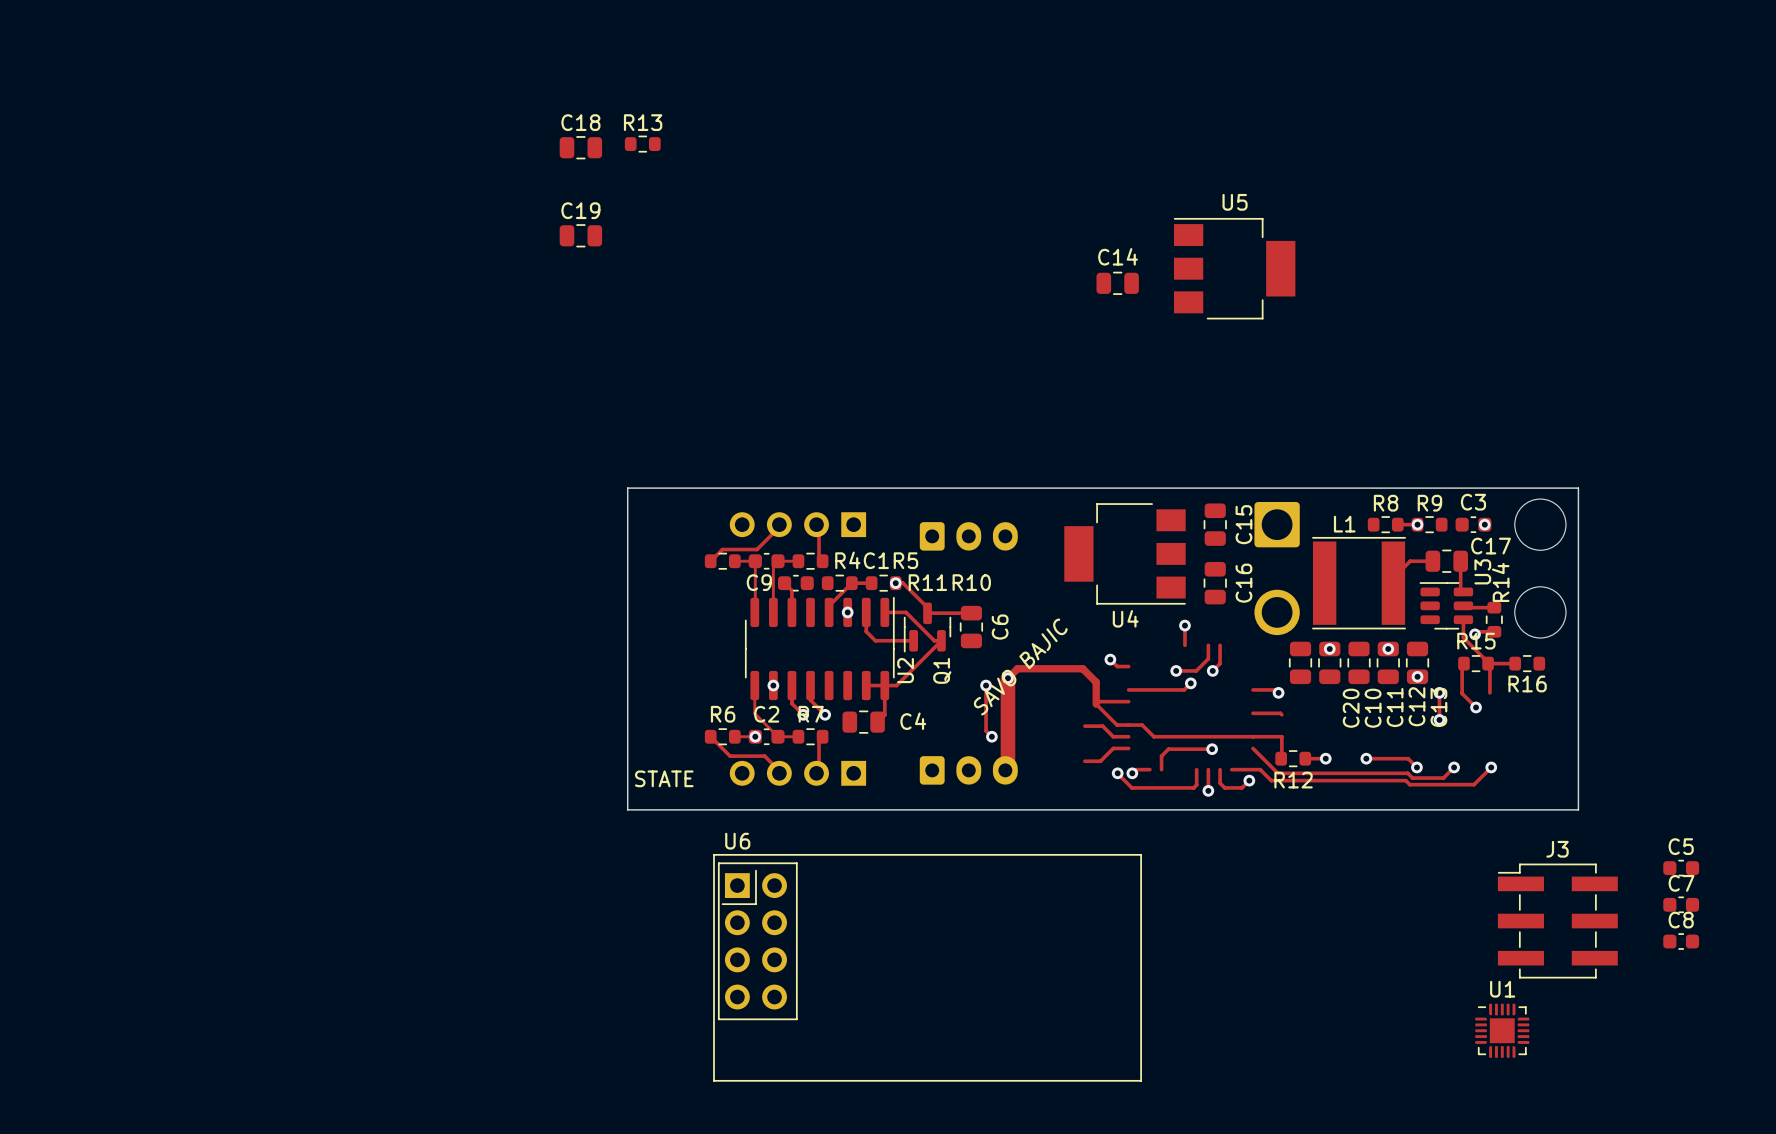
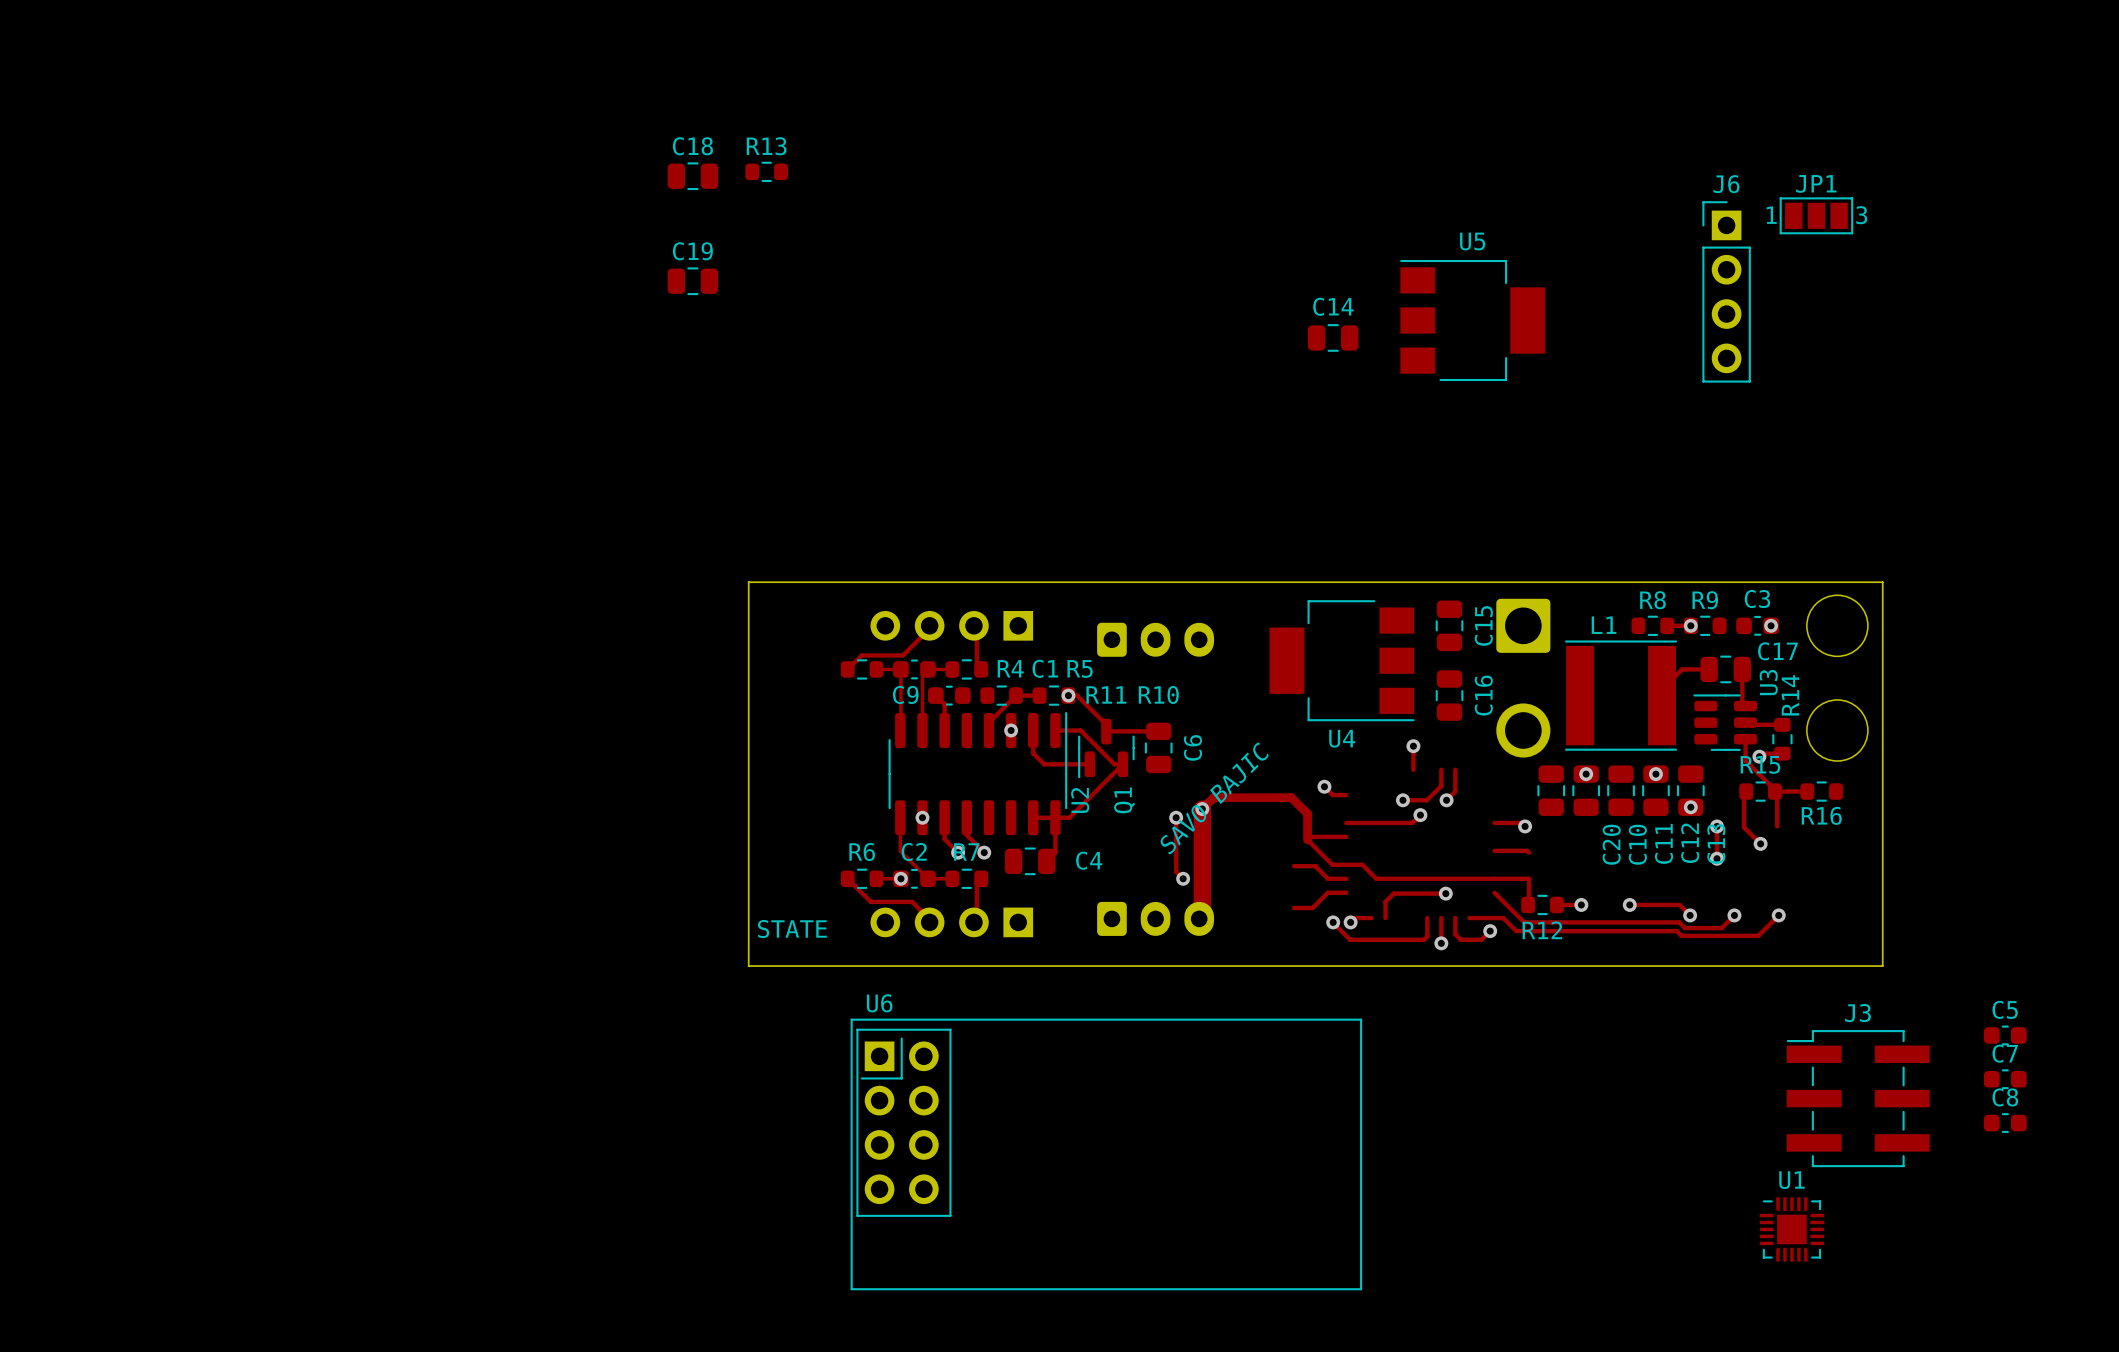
JP1: none -> (1816, 215)
J6: none -> (1726, 291)

